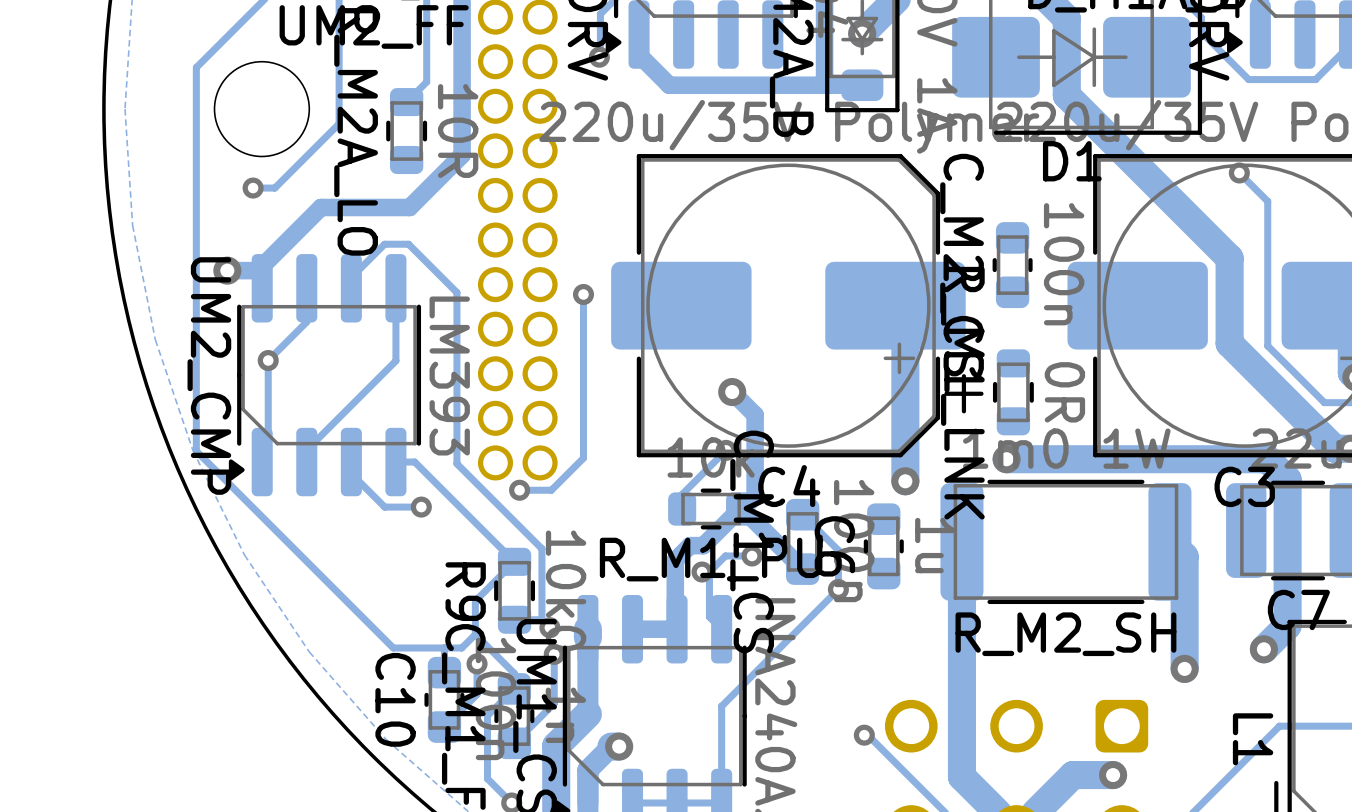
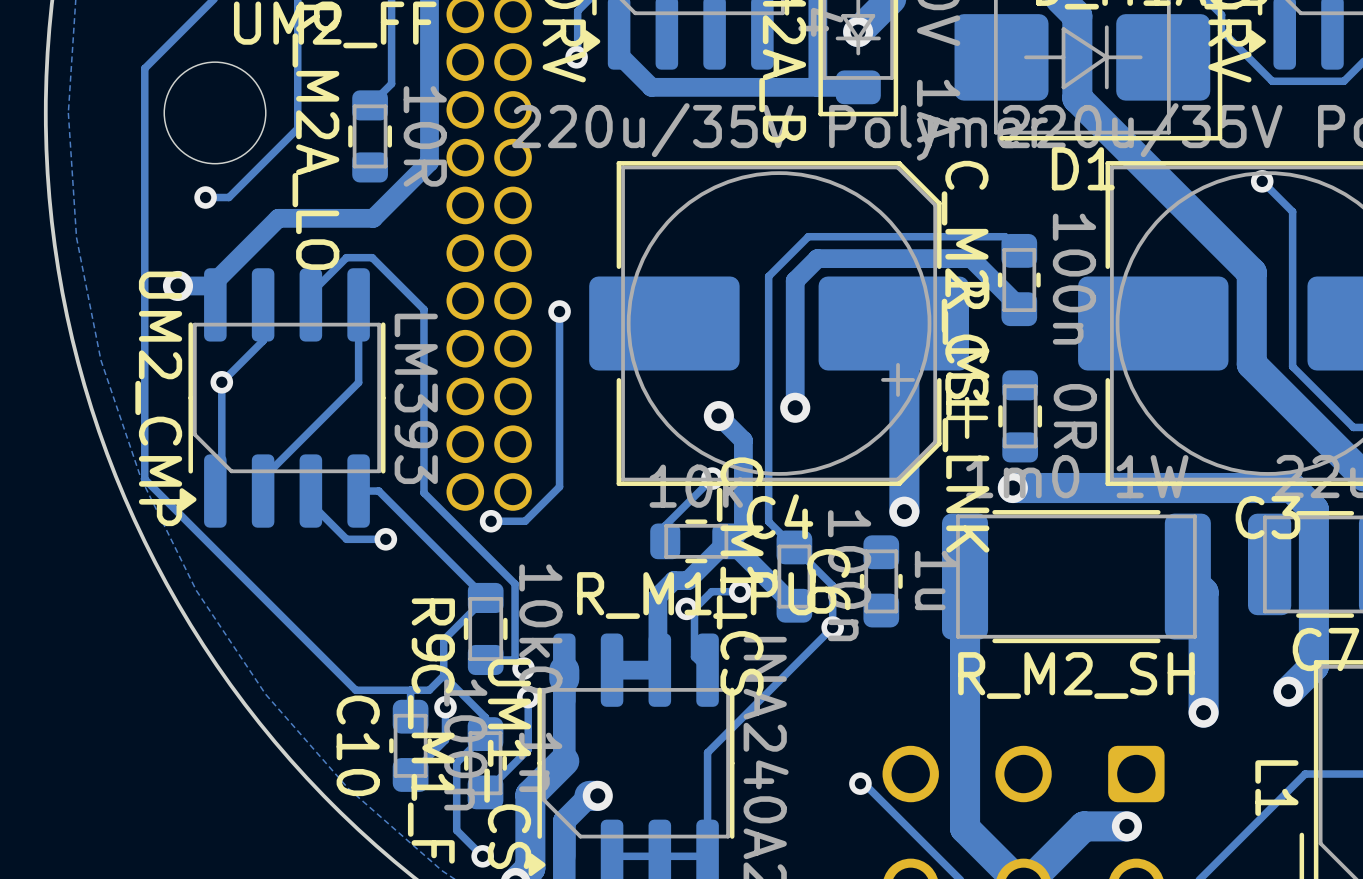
track: none -> (1019, 250) (1005, 236) (808, 236) (768, 276) (768, 521) (794, 547)
track: none -> (1019, 309) (1019, 306) (971, 258) (817, 258) (795, 280) (795, 407)
via: none -> (795, 407)

